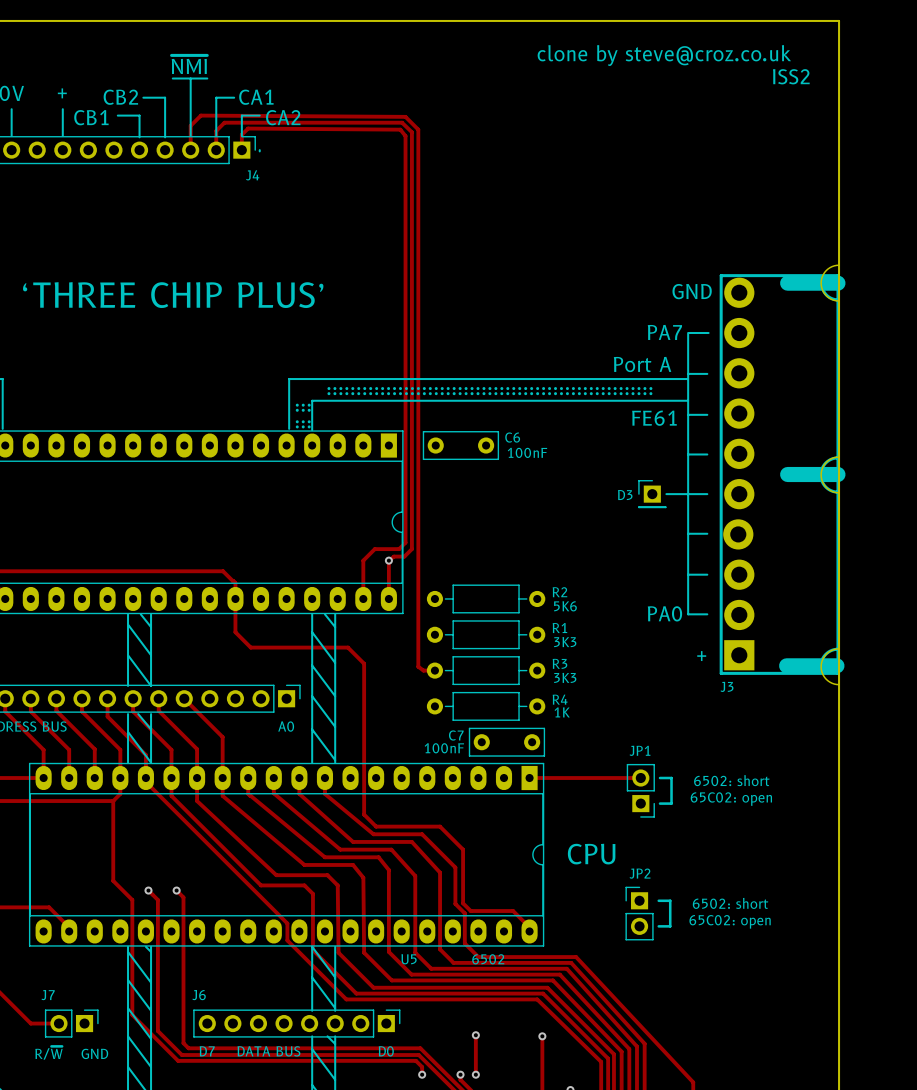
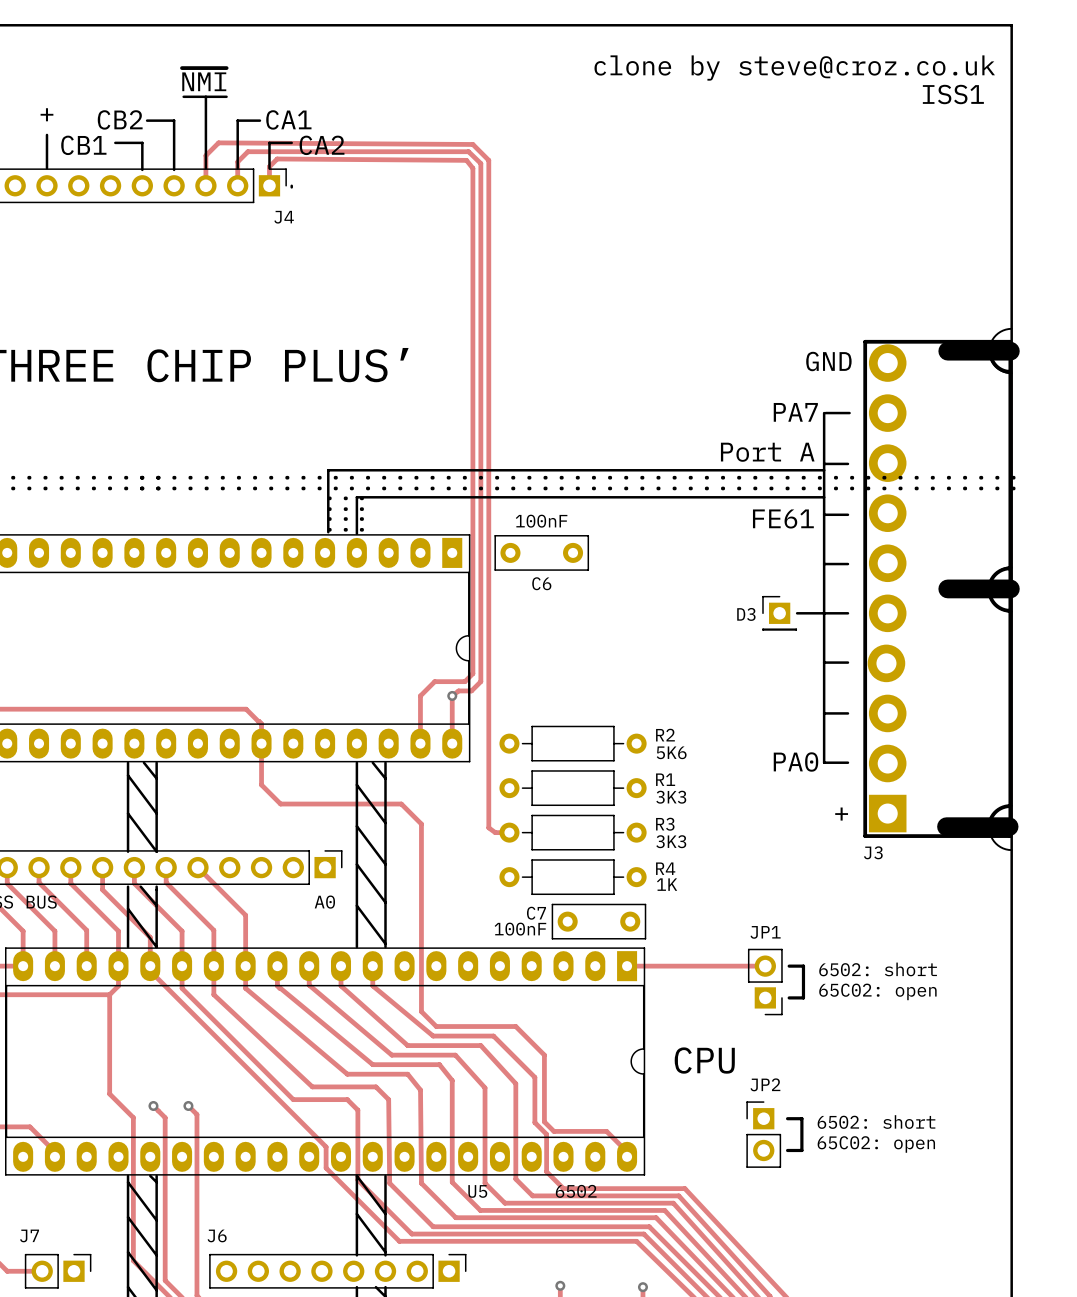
text: ISS2 (791, 76) -> ISS1 (953, 94)
C6 name position: C6 (512, 437) -> C6 (541, 583)
C6 value position: 100nF (527, 452) -> 100nF (541, 521)

